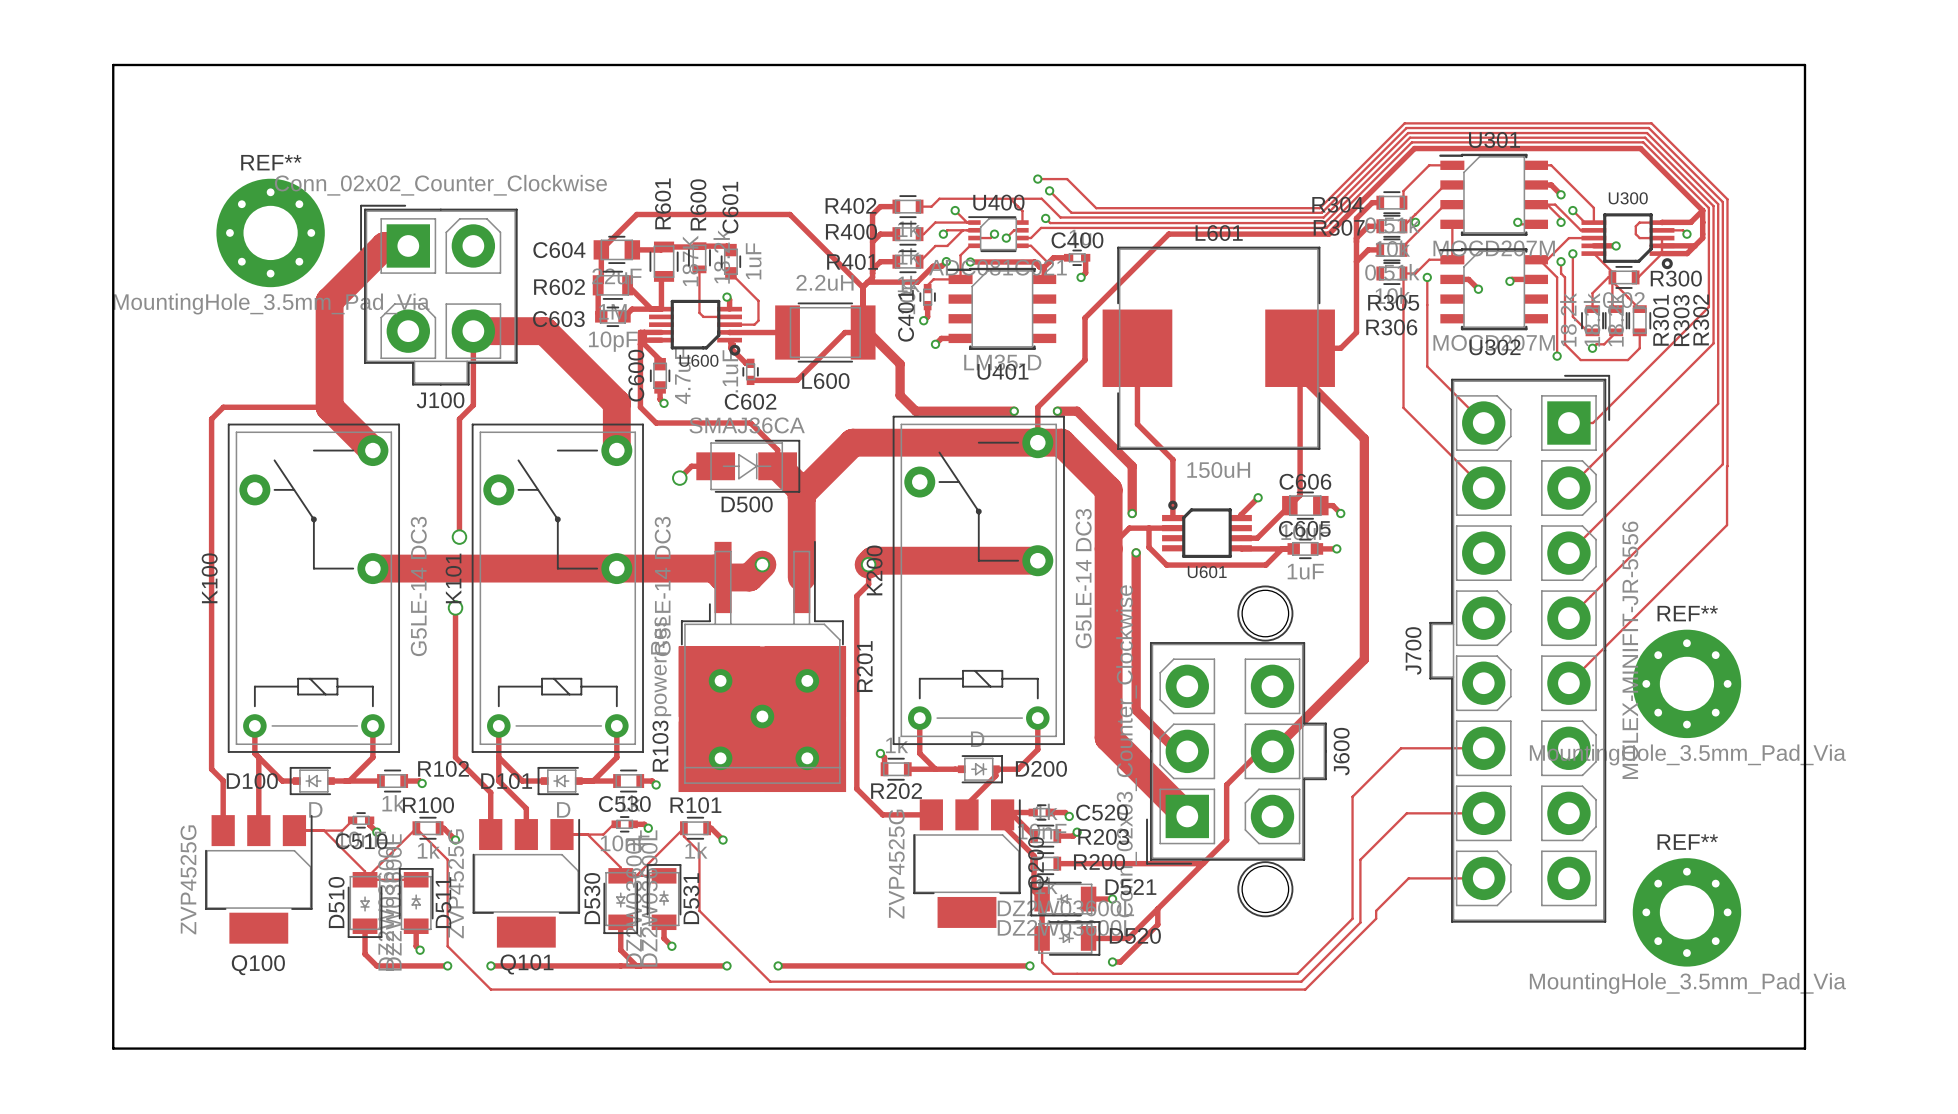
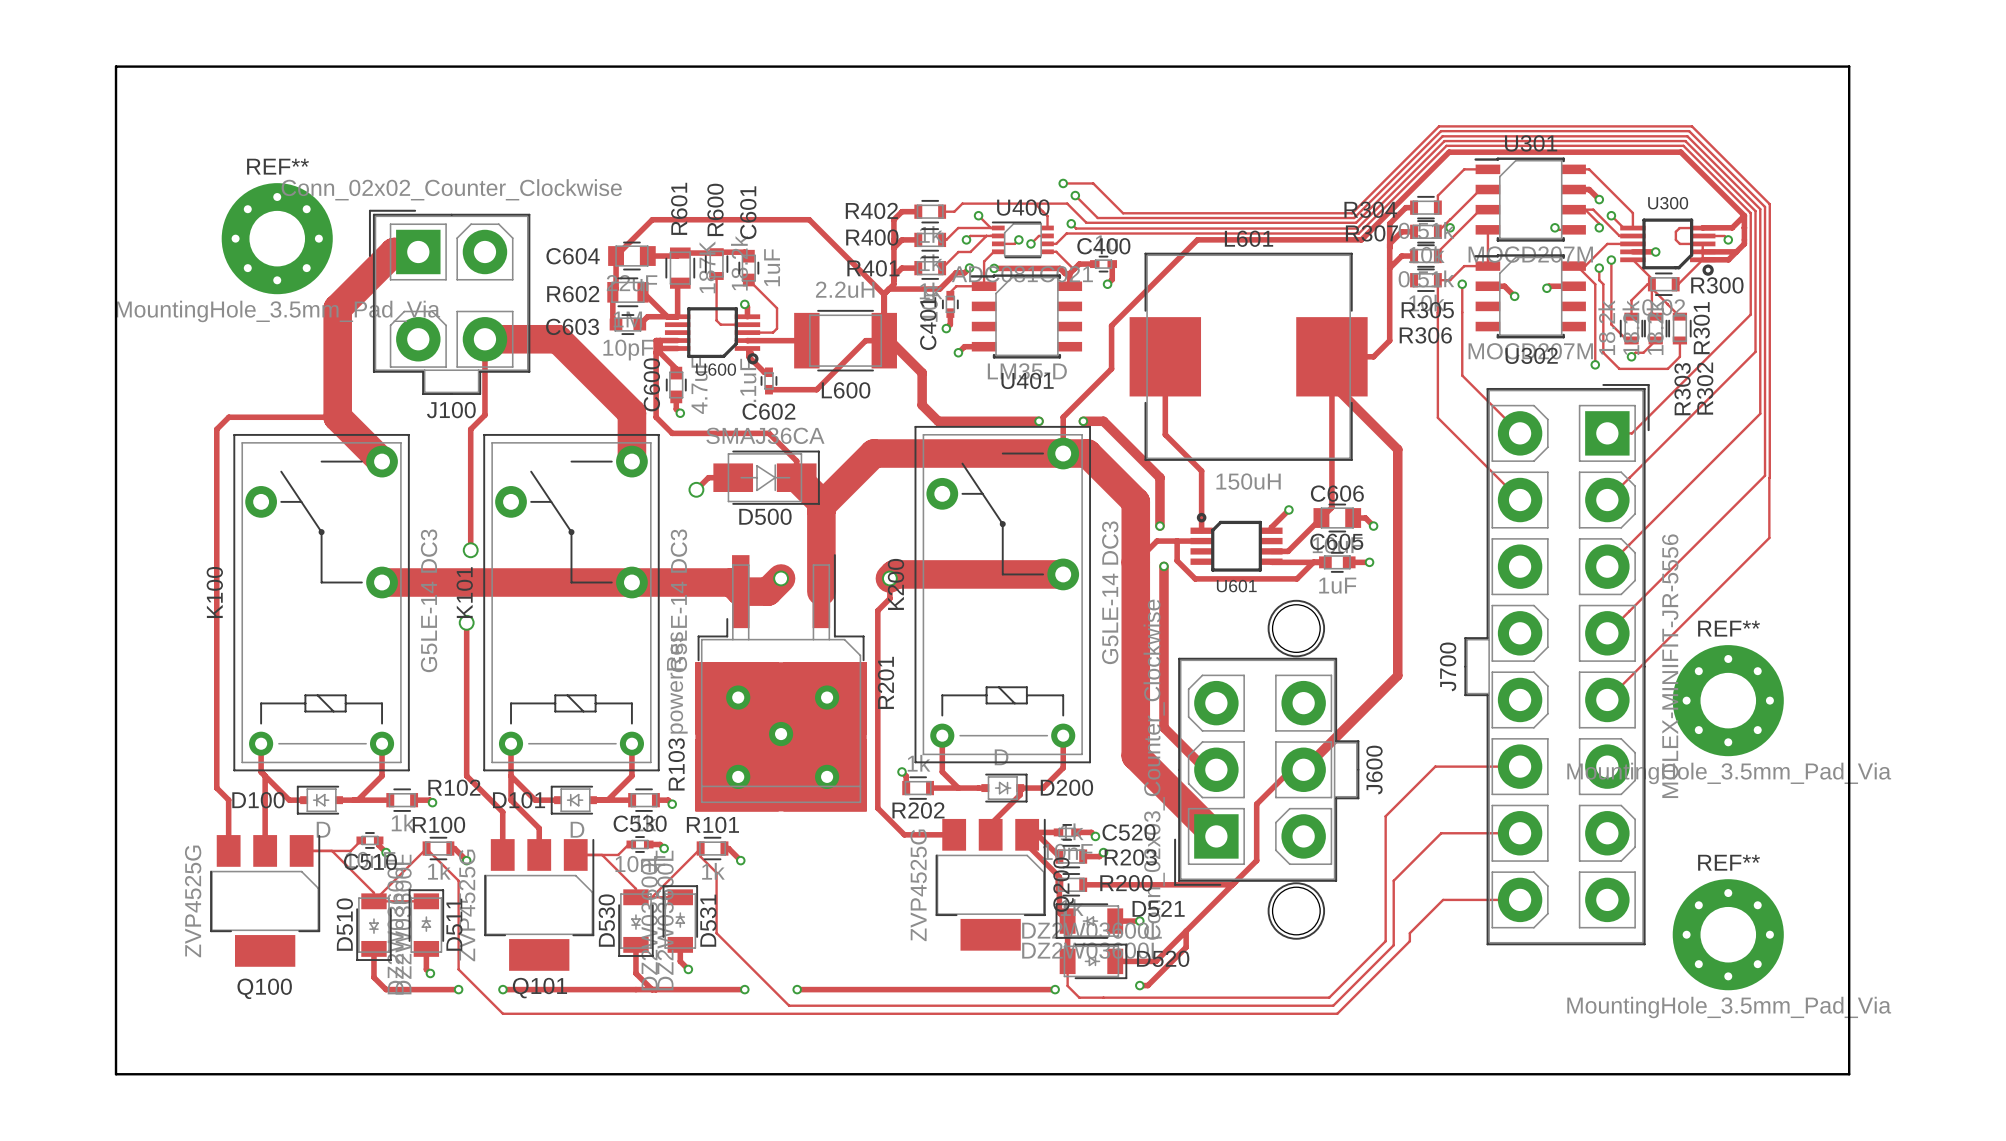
R302 name position: R302 (1701, 319) -> R302 (1705, 388)
R303 name position: R303 (1681, 320) -> R303 (1682, 389)

